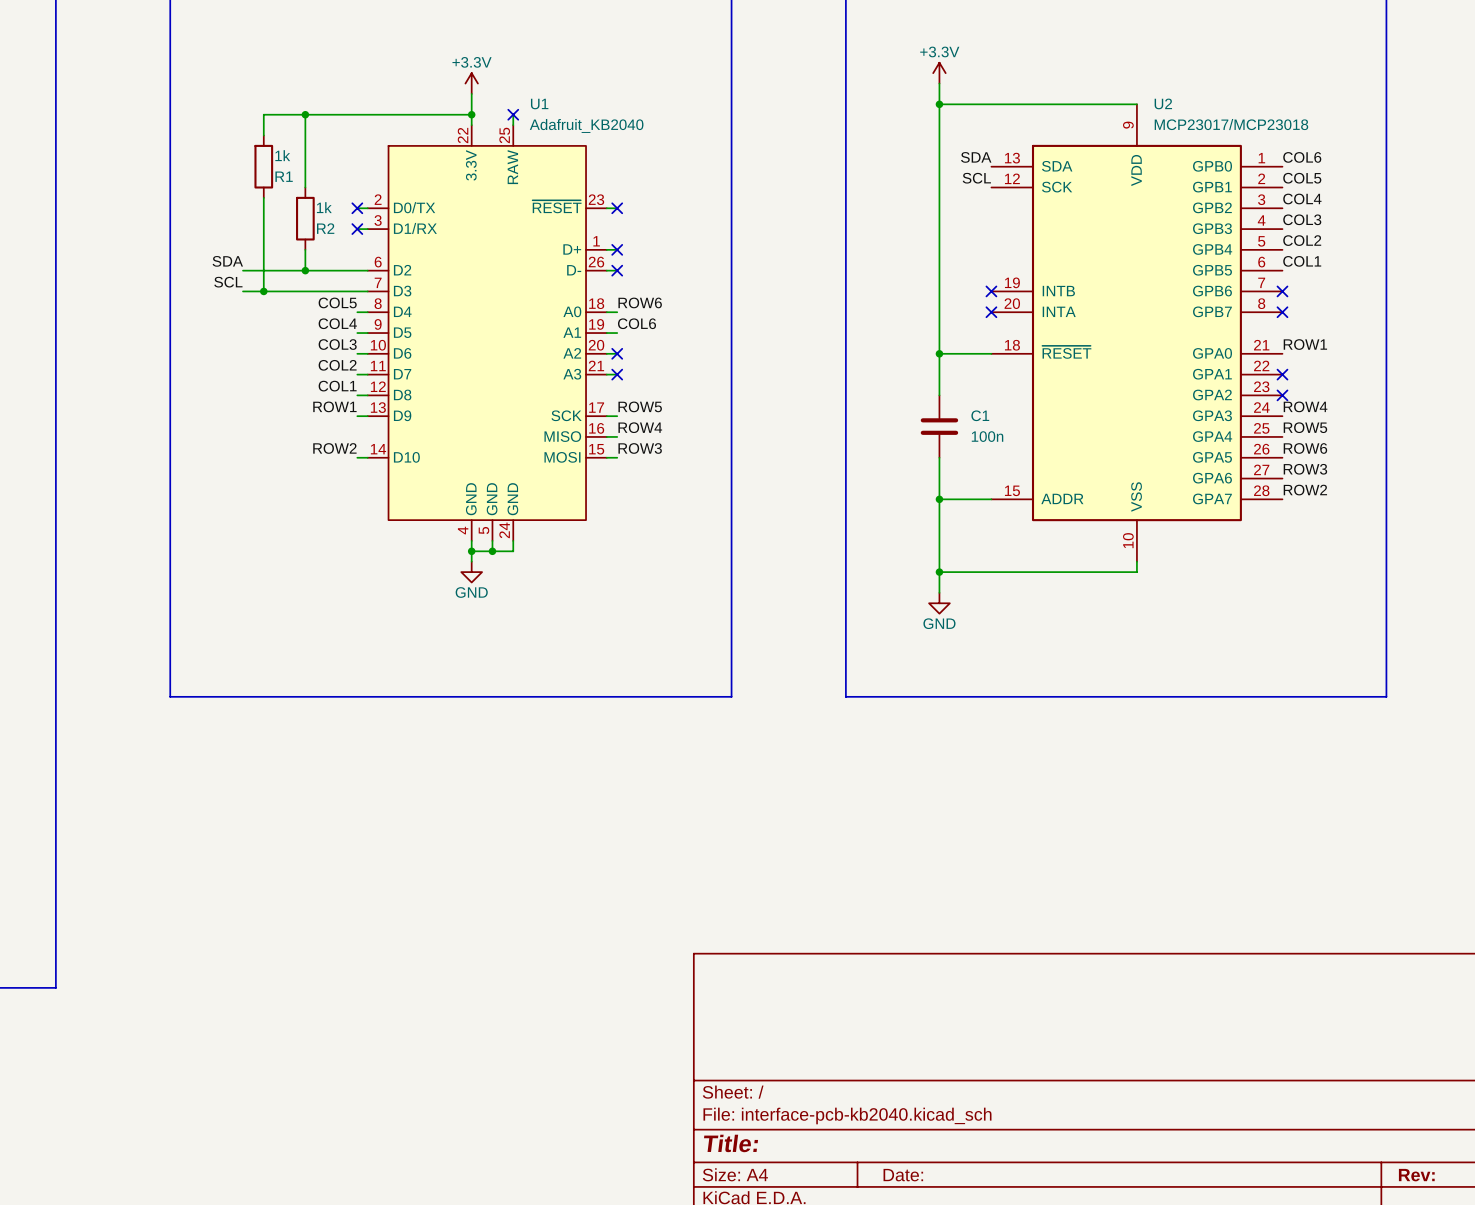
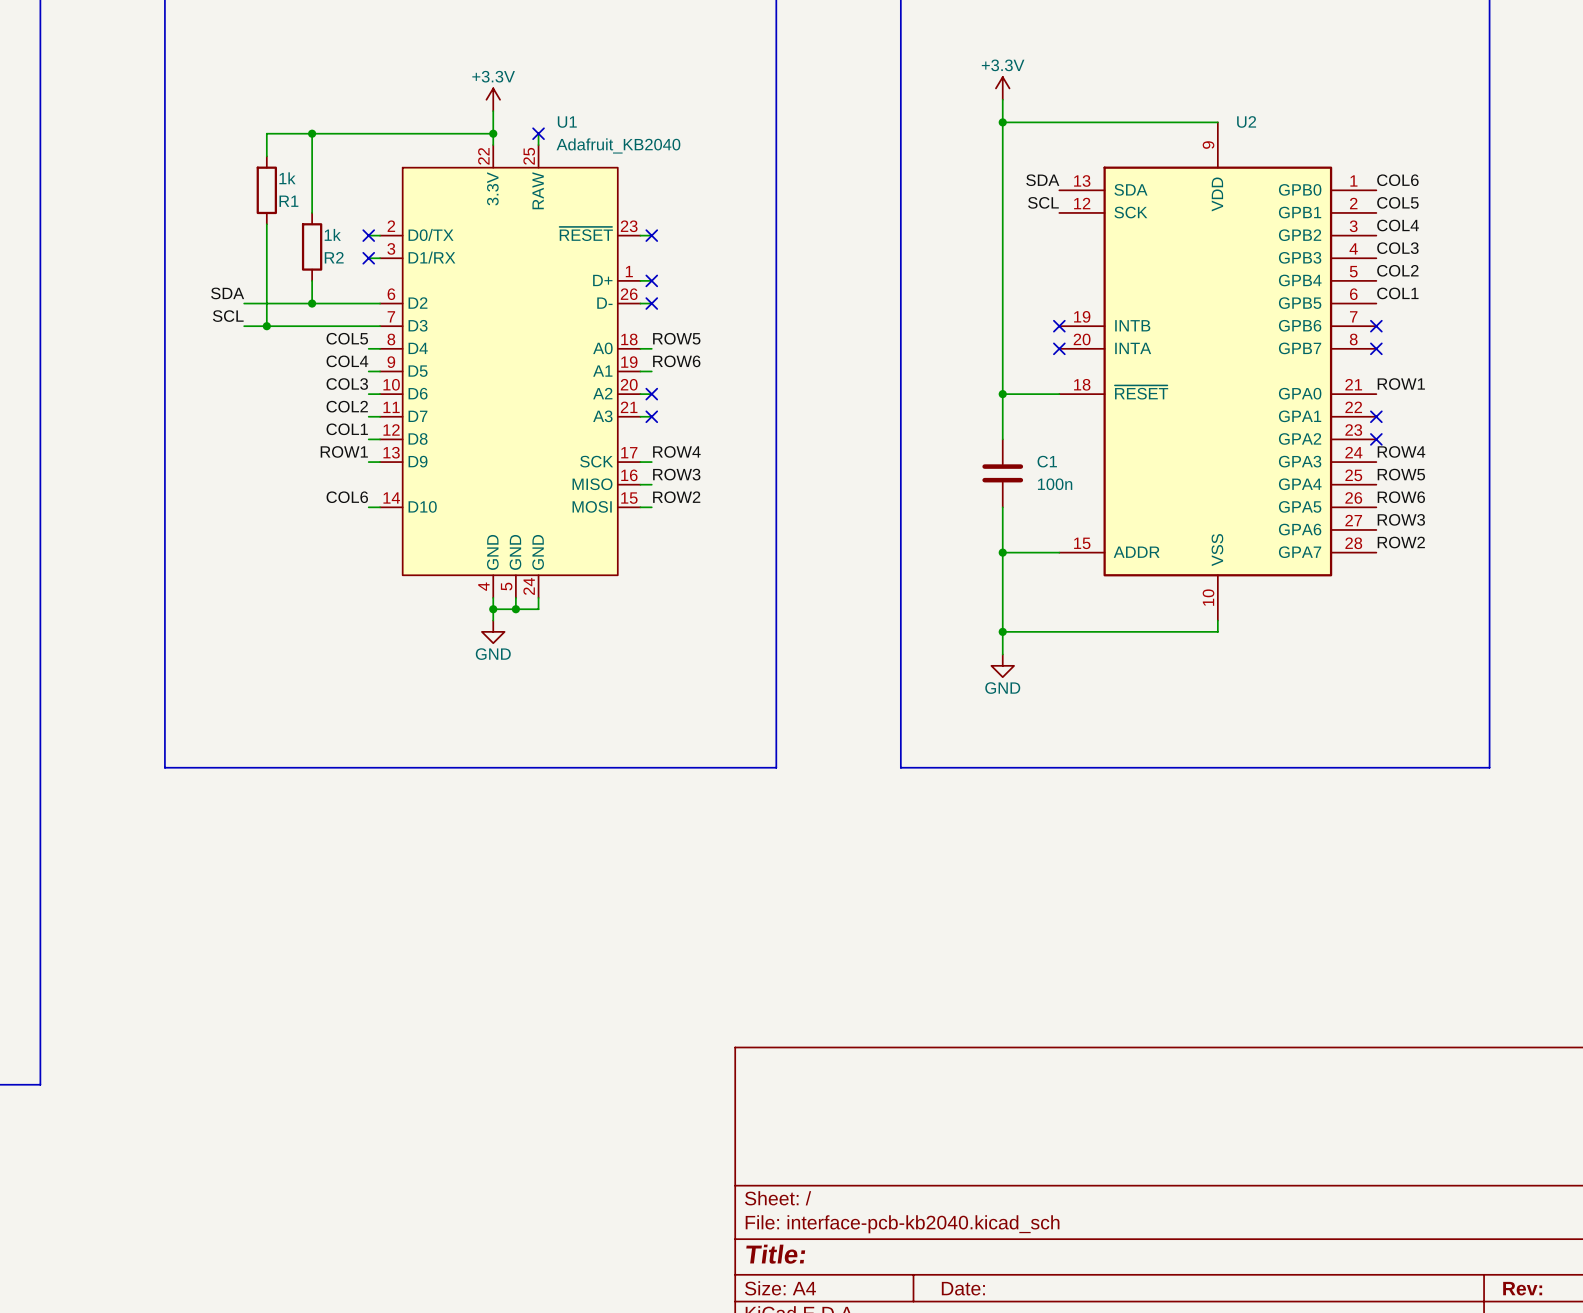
U2 value: MCP23017/MCP23018 (1231, 124) -> none
label: ROW6 (640, 302) -> ROW5 (676, 338)
label: COL6 (637, 323) -> ROW6 (676, 361)
label: ROW5 (640, 406) -> ROW4 (676, 451)
label: ROW4 (640, 427) -> ROW3 (676, 474)
label: ROW2 (334, 448) -> COL6 (347, 497)
label: ROW3 (640, 448) -> ROW2 (676, 497)

